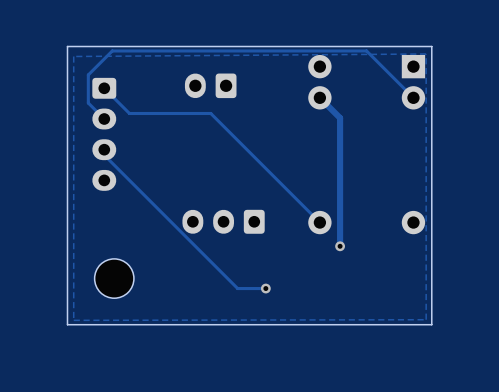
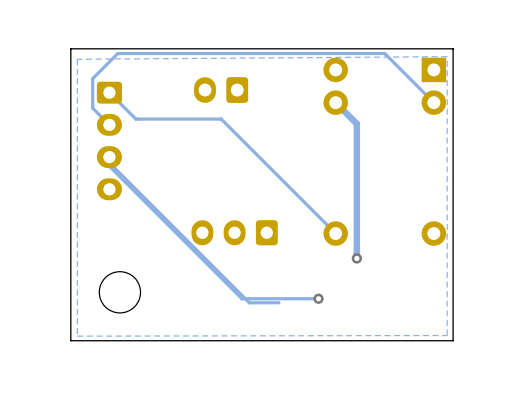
track: none -> (109, 166) (241, 298) (318, 298)
via position: (265, 288) -> (318, 298)

